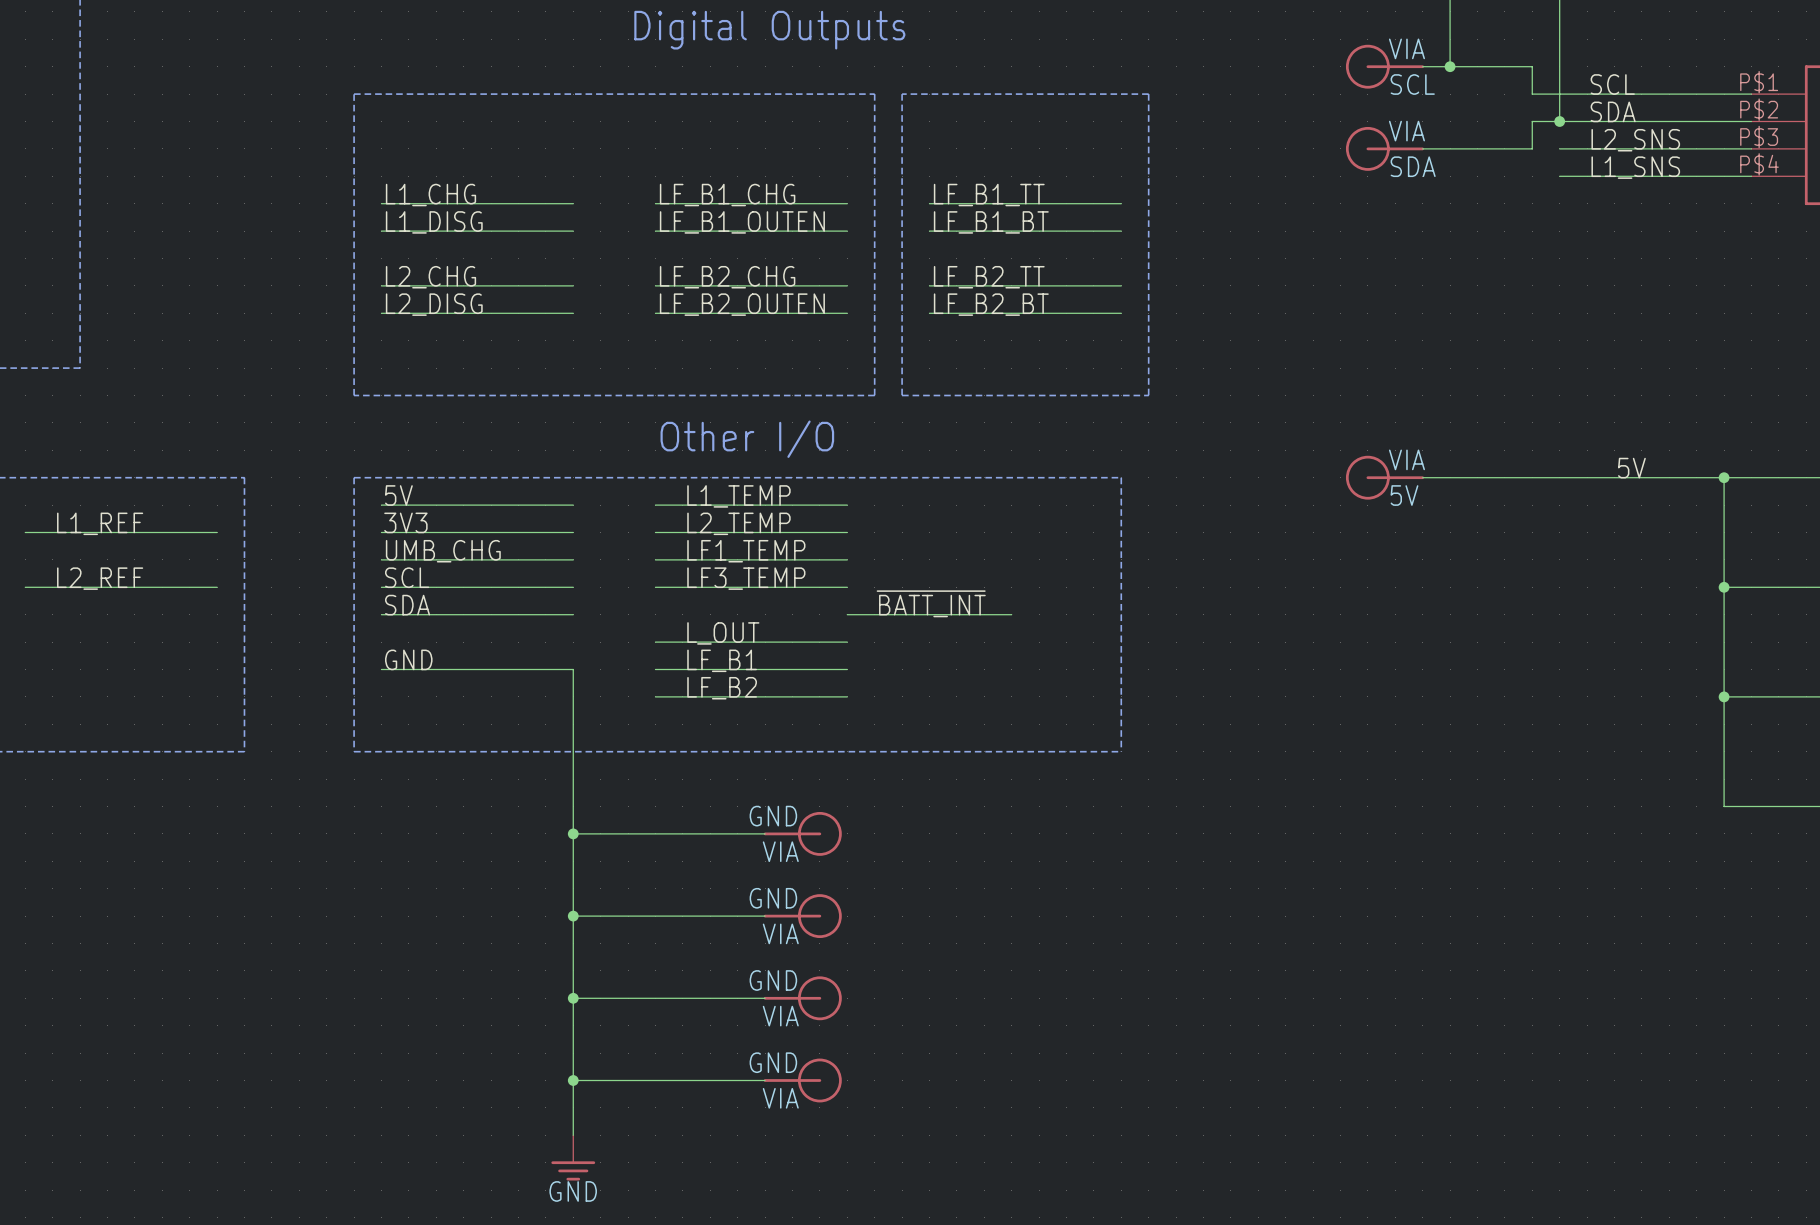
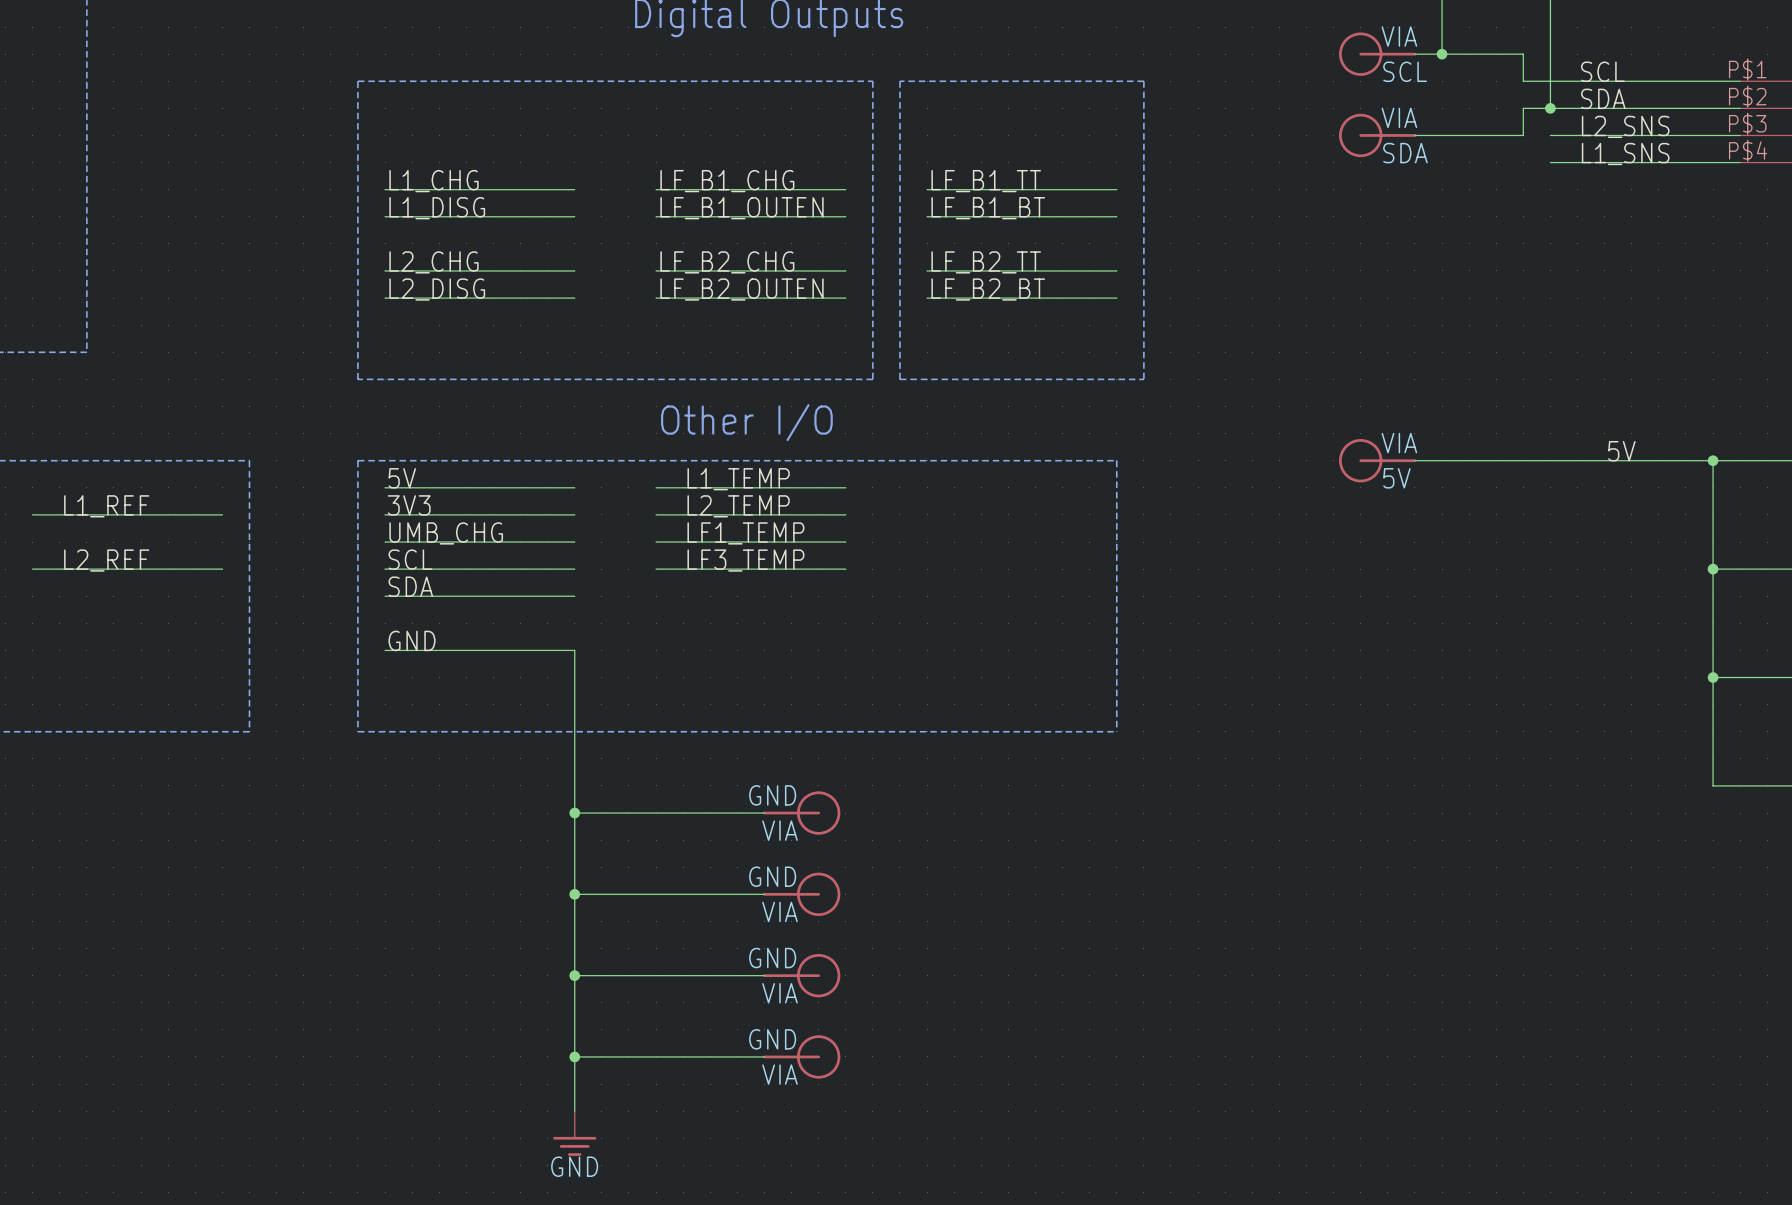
label: ~{BATT_INT} (931, 603) -> none
wire: (847, 614) (1011, 614) -> none
label: L_OUT (723, 633) -> none
wire: (655, 642) (847, 642) -> none
label: LF_B1 (722, 660) -> none
wire: (655, 669) (847, 669) -> none
label: LF_B2 (722, 688) -> none
wire: (655, 696) (847, 696) -> none

